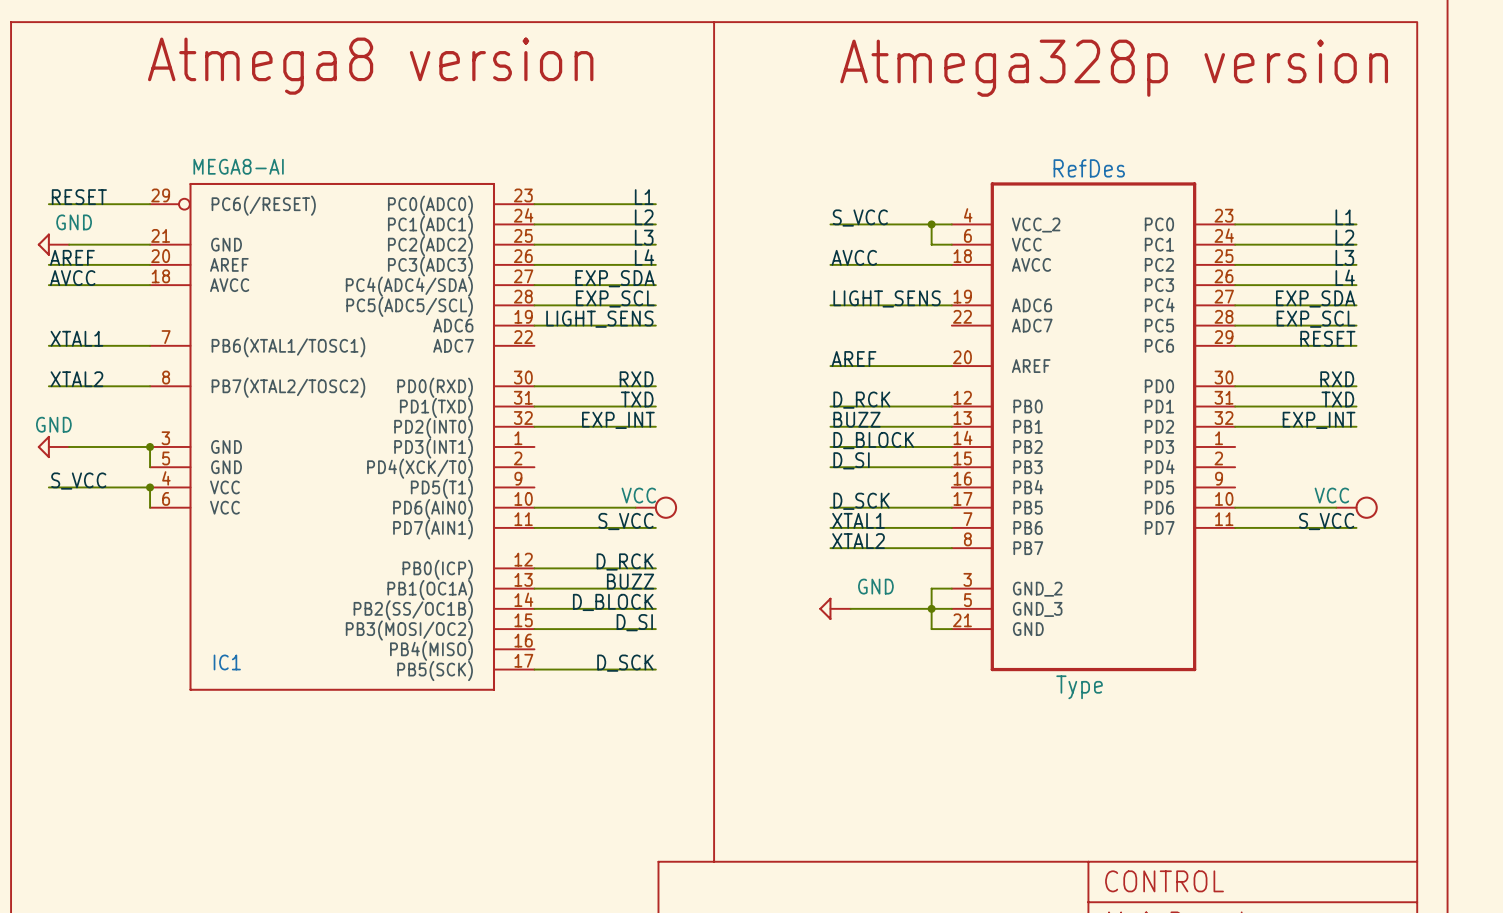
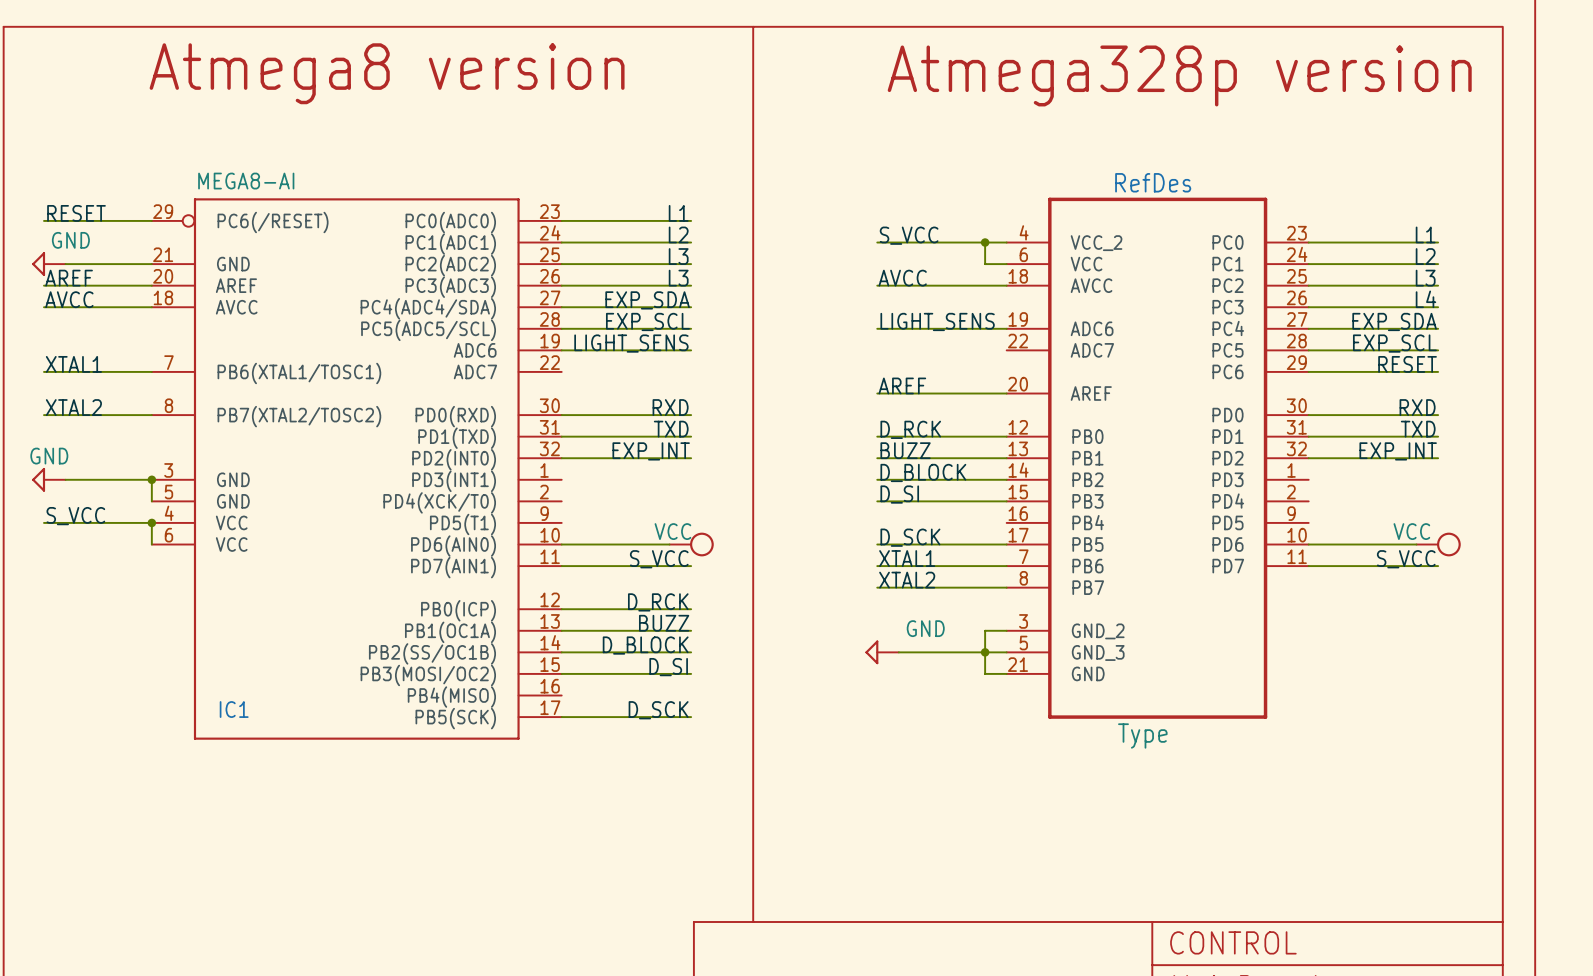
label: L4 (644, 257) -> L3 (678, 278)

